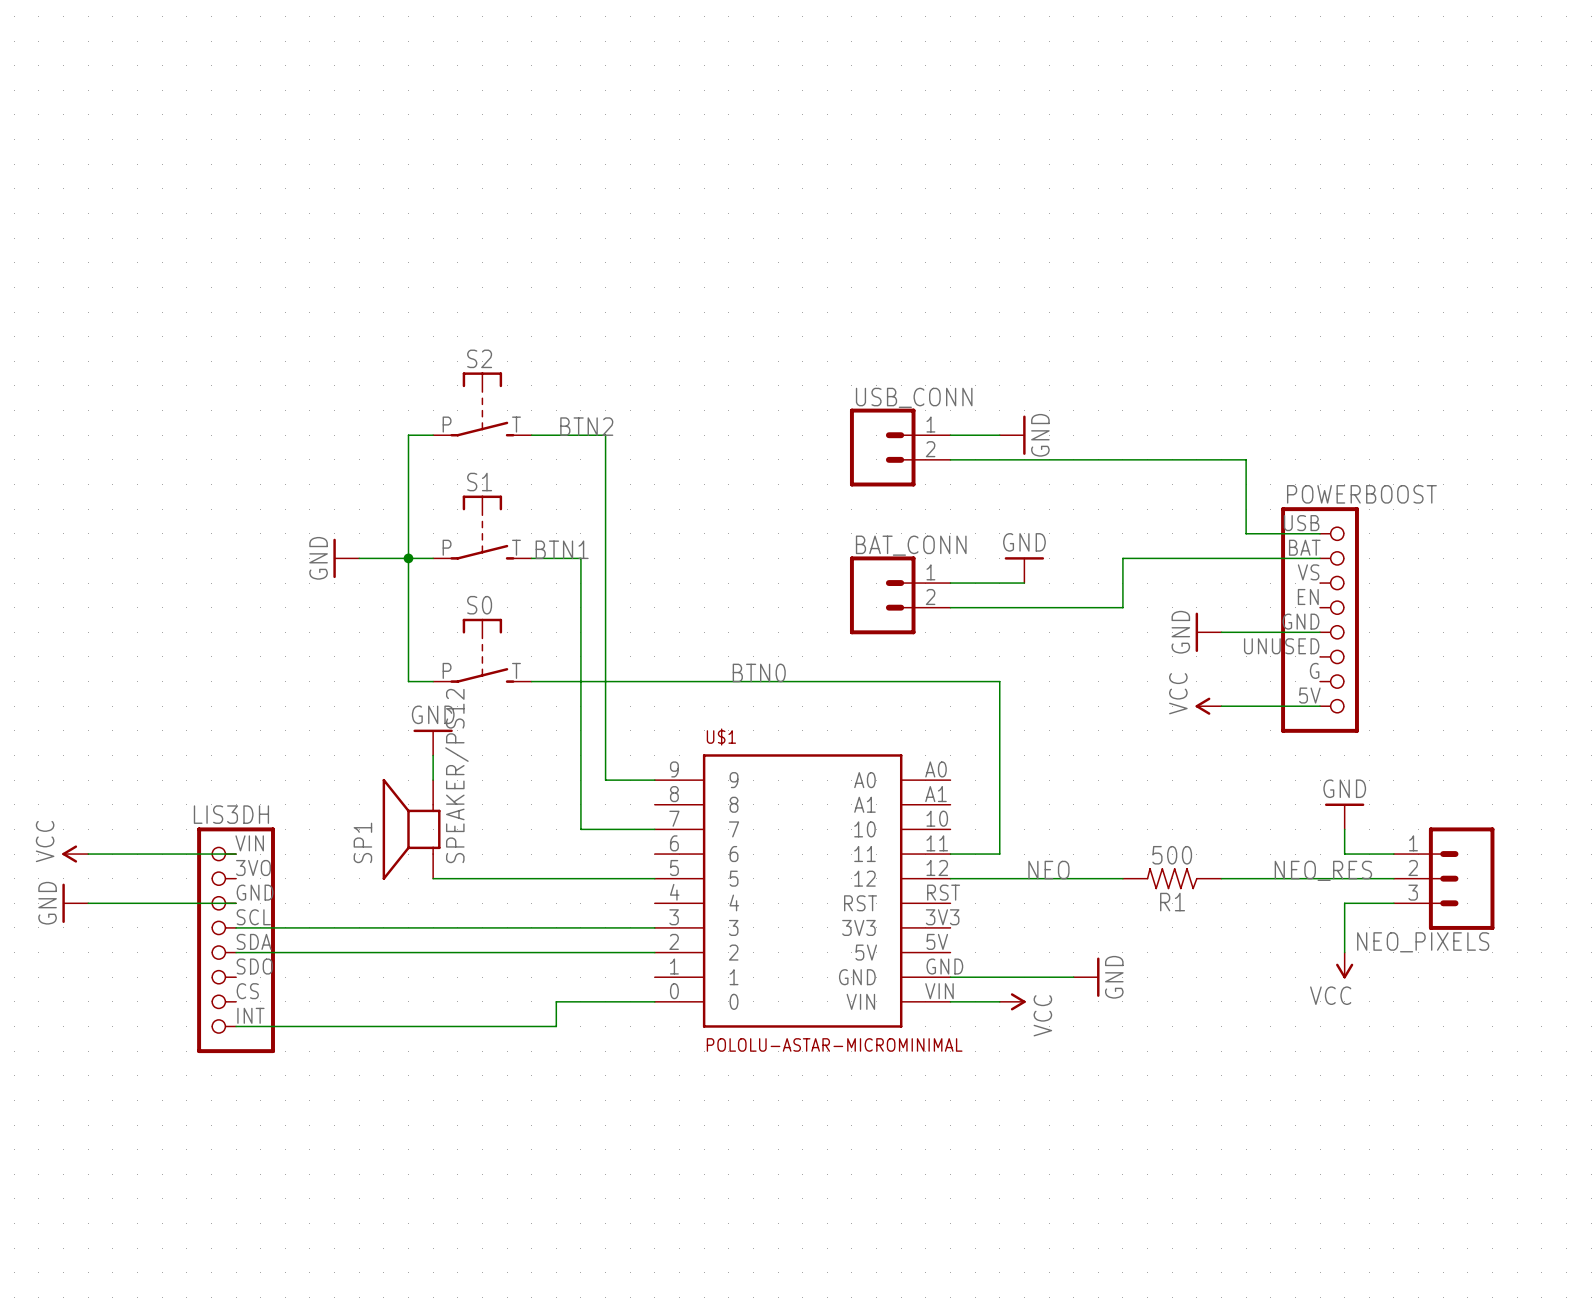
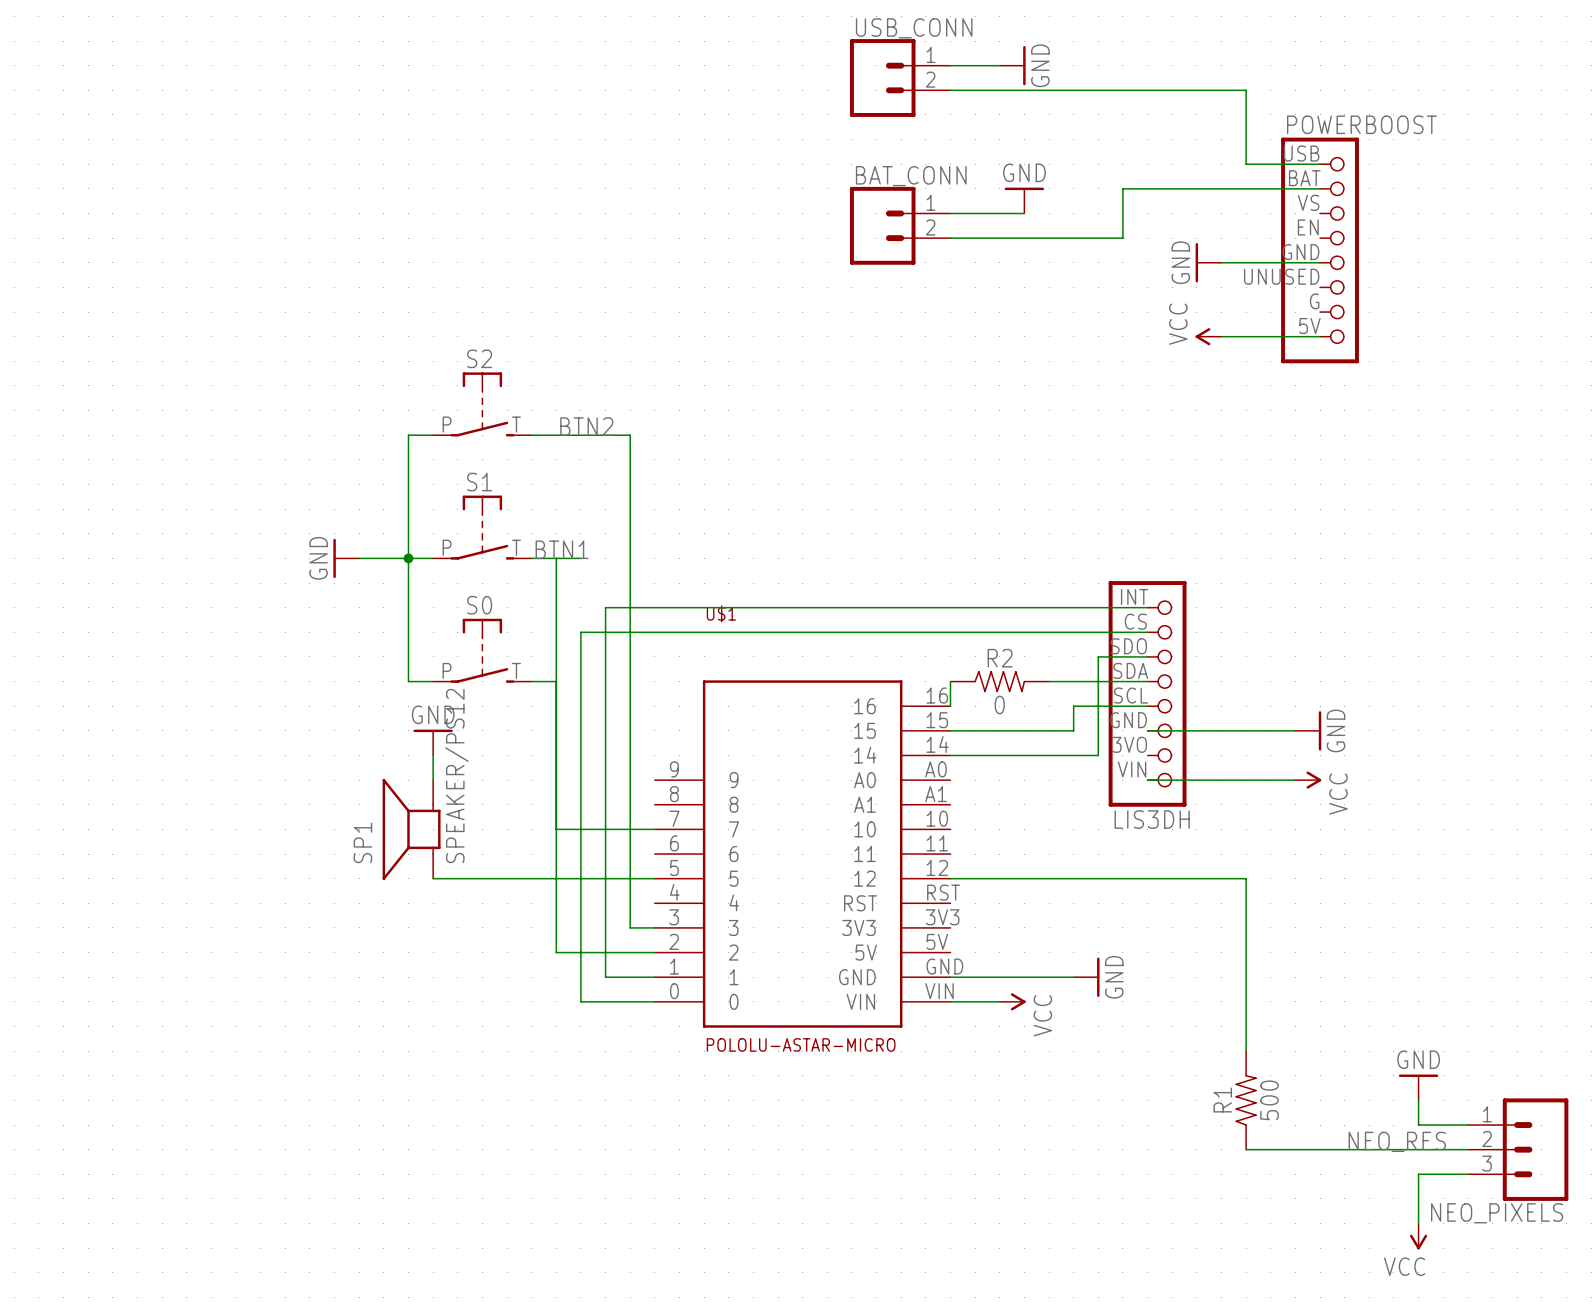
wire: none -> (950, 65) (999, 65)
power symbol: none -> GND (1012, 65)
USB_CONN: none -> (900, 78)
wire: none -> (950, 90) (1246, 90) (1246, 164) (1320, 164)
wire: none -> (1320, 188) (1122, 188) (1122, 238) (950, 238)
power symbol: none -> GND (1024, 200)
wire: none -> (950, 213) (1024, 213)
BAT_CONN: none -> (900, 225)
POWERBOOST: none -> (1320, 250)
power symbol: none -> GND (1208, 262)
wire: none -> (1221, 262) (1320, 262)
power symbol: none -> VCC (1208, 336)
wire: none -> (1221, 336) (1320, 336)
wire: (605, 435) (605, 607) -> (605, 435) (630, 435) (630, 927)
wire: (950, 435) (999, 435) -> none
power symbol: GND (1012, 435) -> none
USB_CONN: (900, 447) -> none
wire: (950, 459) (1246, 459) (1246, 533) (1320, 533) -> none
wire: (580, 558) (580, 632) -> (1147, 632) (580, 632)
wire: (1320, 558) (1122, 558) (1122, 607) -> (1147, 607) (1122, 607)
power symbol: GND (1024, 570) -> none
wire: (950, 583) (1024, 583) -> none
BAT_CONN: (900, 595) -> none
wire: none -> (605, 607) (950, 607)
POWERBOOST: (1320, 619) -> none
power symbol: GND (1208, 632) -> none
wire: (1221, 632) (1320, 632) -> none
wire: none -> (1147, 656) (1098, 656) (1098, 755) (950, 755)
label: BTN0 (759, 672) -> none
wire: (556, 681) (999, 681) (999, 854) (950, 854) -> none
wire: none -> (950, 681) (950, 706)
R2: none -> 0 (999, 681)
wire: none -> (1147, 706) (1073, 706) (1073, 730) (950, 730)
power symbol: VCC (1208, 706) -> none
wire: (1221, 706) (1320, 706) -> (1049, 681) (1147, 681)
wire: none -> (1147, 730) (1295, 730)
power symbol: none -> GND (1308, 730)
U$1 name position: U$1 (721, 737) -> U$1 (721, 613)
U$1 symbol: [654, 754, 951, 1028] -> [654, 680, 951, 1028]
wire: (605, 780) (654, 780) -> (605, 780) (605, 977) (654, 977)
wire: none -> (1147, 780) (1295, 780)
power symbol: none -> VCC (1308, 780)
power symbol: GND (1344, 816) -> none
wire: (1344, 829) (1344, 854) (1393, 854) -> none
power symbol: VCC (75, 854) -> none
wire: (88, 854) (236, 854) -> none
label: NEO (1048, 870) -> none
label: NEO_RES (1323, 870) -> none
R1 rotation: 0° (1172, 878) -> 90° clockwise (1246, 1100)
R1 position: (1172, 878) -> (1246, 1100)
wire: (1246, 878) (1393, 878) -> (1246, 878) (1246, 1051)
NEO_PIXELS: (1444, 878) -> none
power symbol: GND (75, 903) -> none
wire: (88, 903) (236, 903) -> none
wire: (1393, 903) (1344, 903) (1344, 952) -> none
wire: (236, 927) (630, 927) -> none
LIS3DH rotation: 0° (236, 940) -> 180° (1147, 693)
LIS3DH position: (236, 940) -> (1147, 693)
wire: (236, 952) (556, 952) -> (556, 558) (556, 952)
power symbol: VCC (1344, 965) -> none
wire: (580, 1001) (556, 1001) (556, 1026) (236, 1026) -> (580, 1001) (580, 829) (556, 829)
U$1 value: POLOLU-ASTAR-MICROMINIMAL (834, 1044) -> POLOLU-ASTAR-MICRO (801, 1044)
power symbol: none -> GND (1418, 1087)
wire: none -> (1418, 1100) (1418, 1125) (1467, 1125)
label: none -> NEO_RES (1397, 1141)
wire: none -> (1246, 1149) (1467, 1149)
NEO_PIXELS: none -> (1518, 1149)
wire: none -> (1467, 1174) (1418, 1174) (1418, 1223)
power symbol: none -> VCC (1418, 1236)

